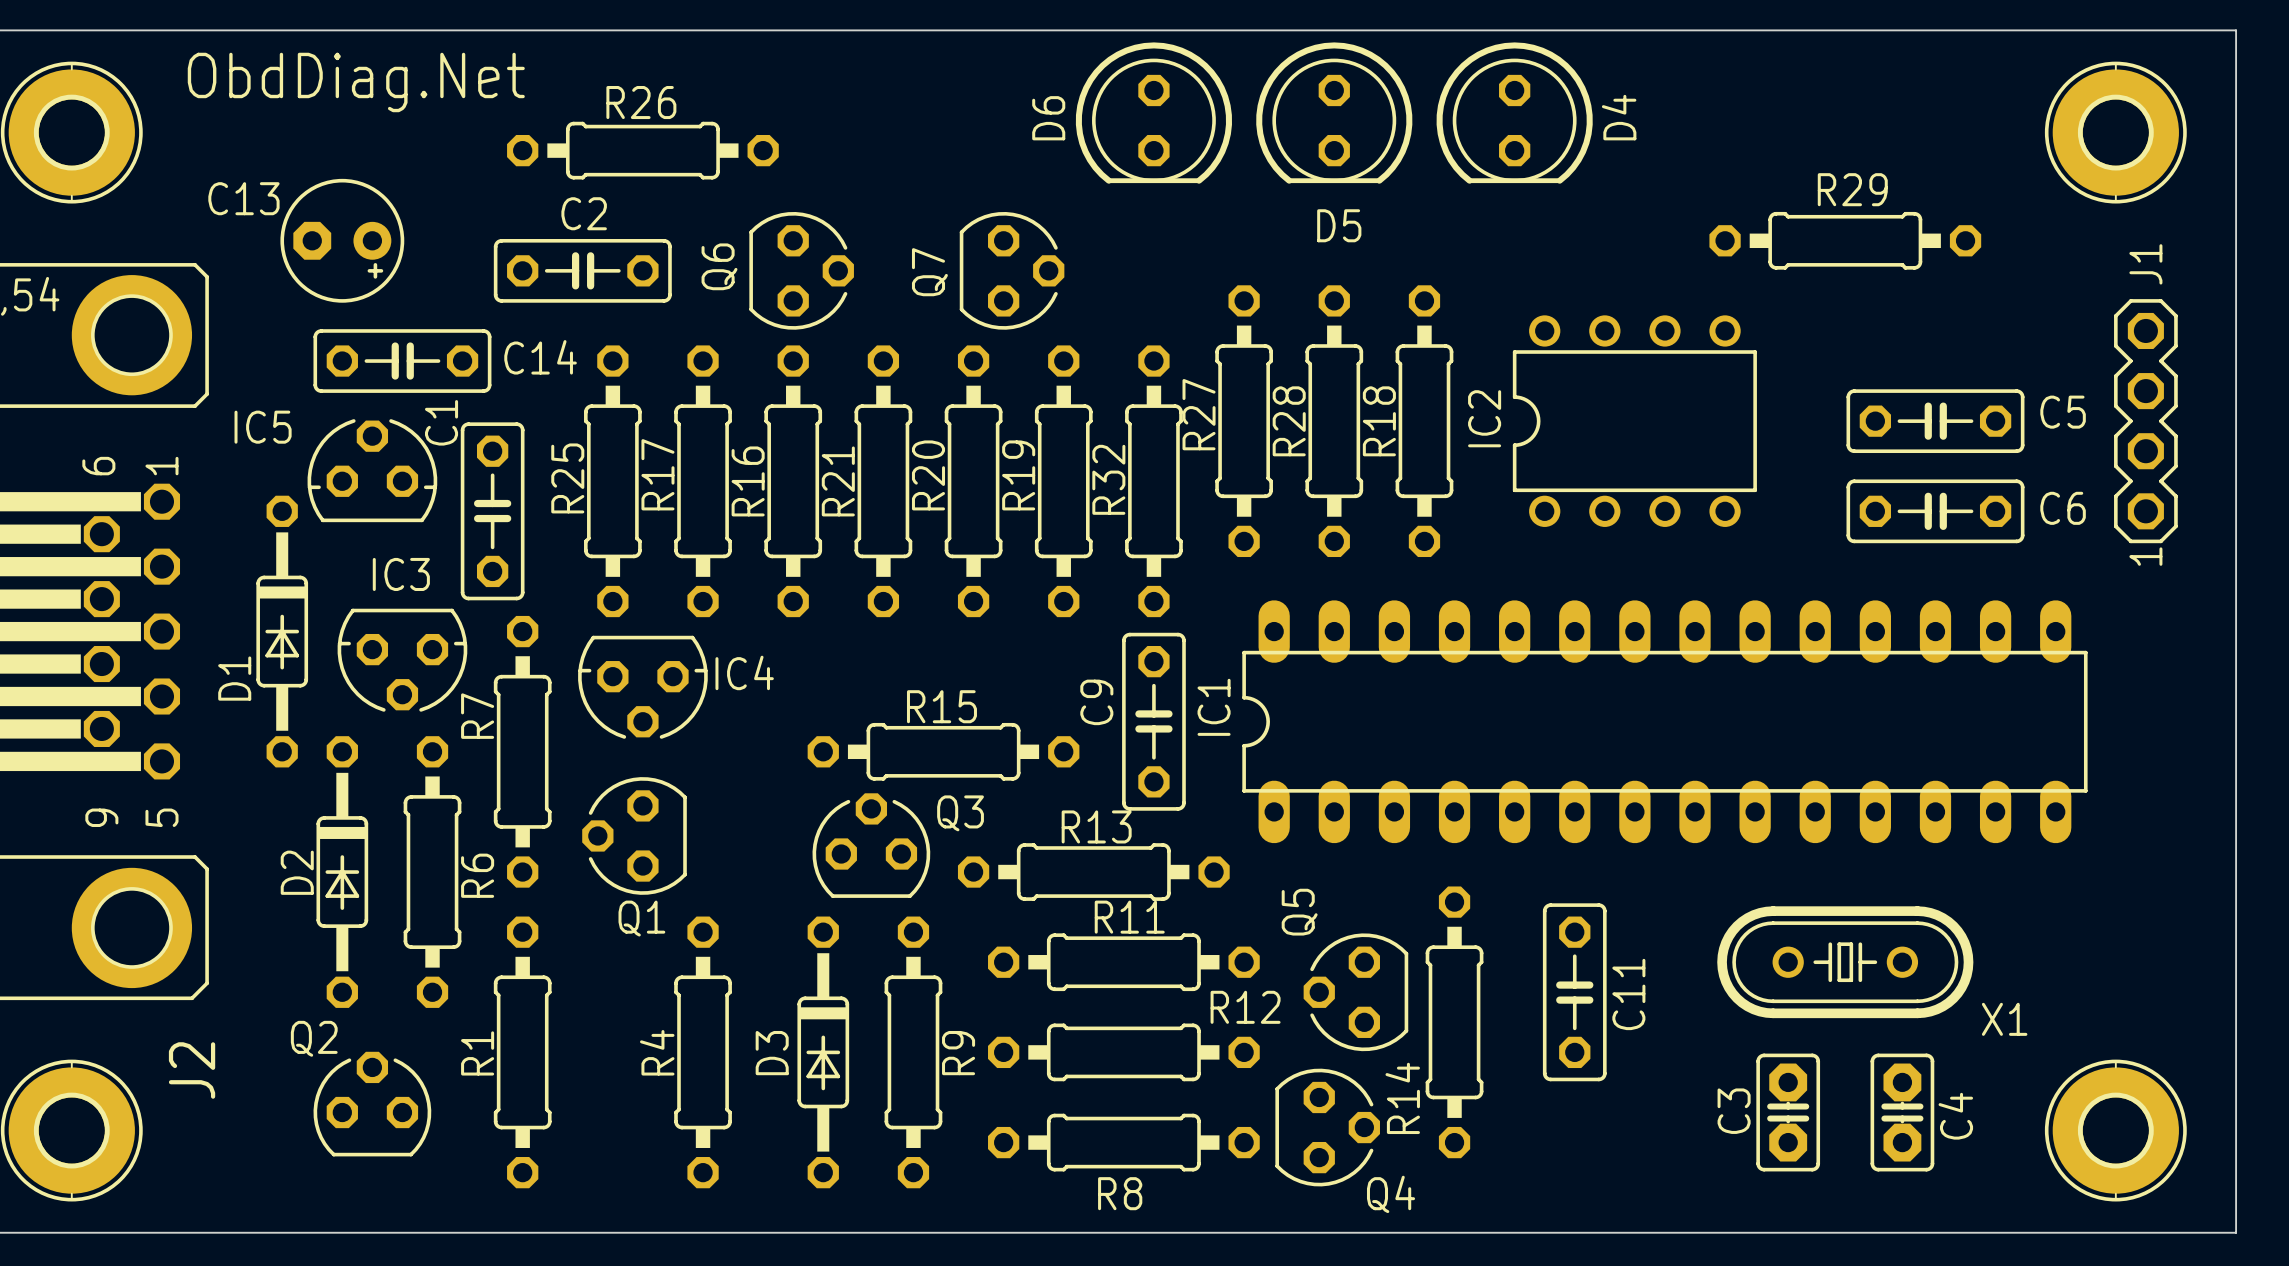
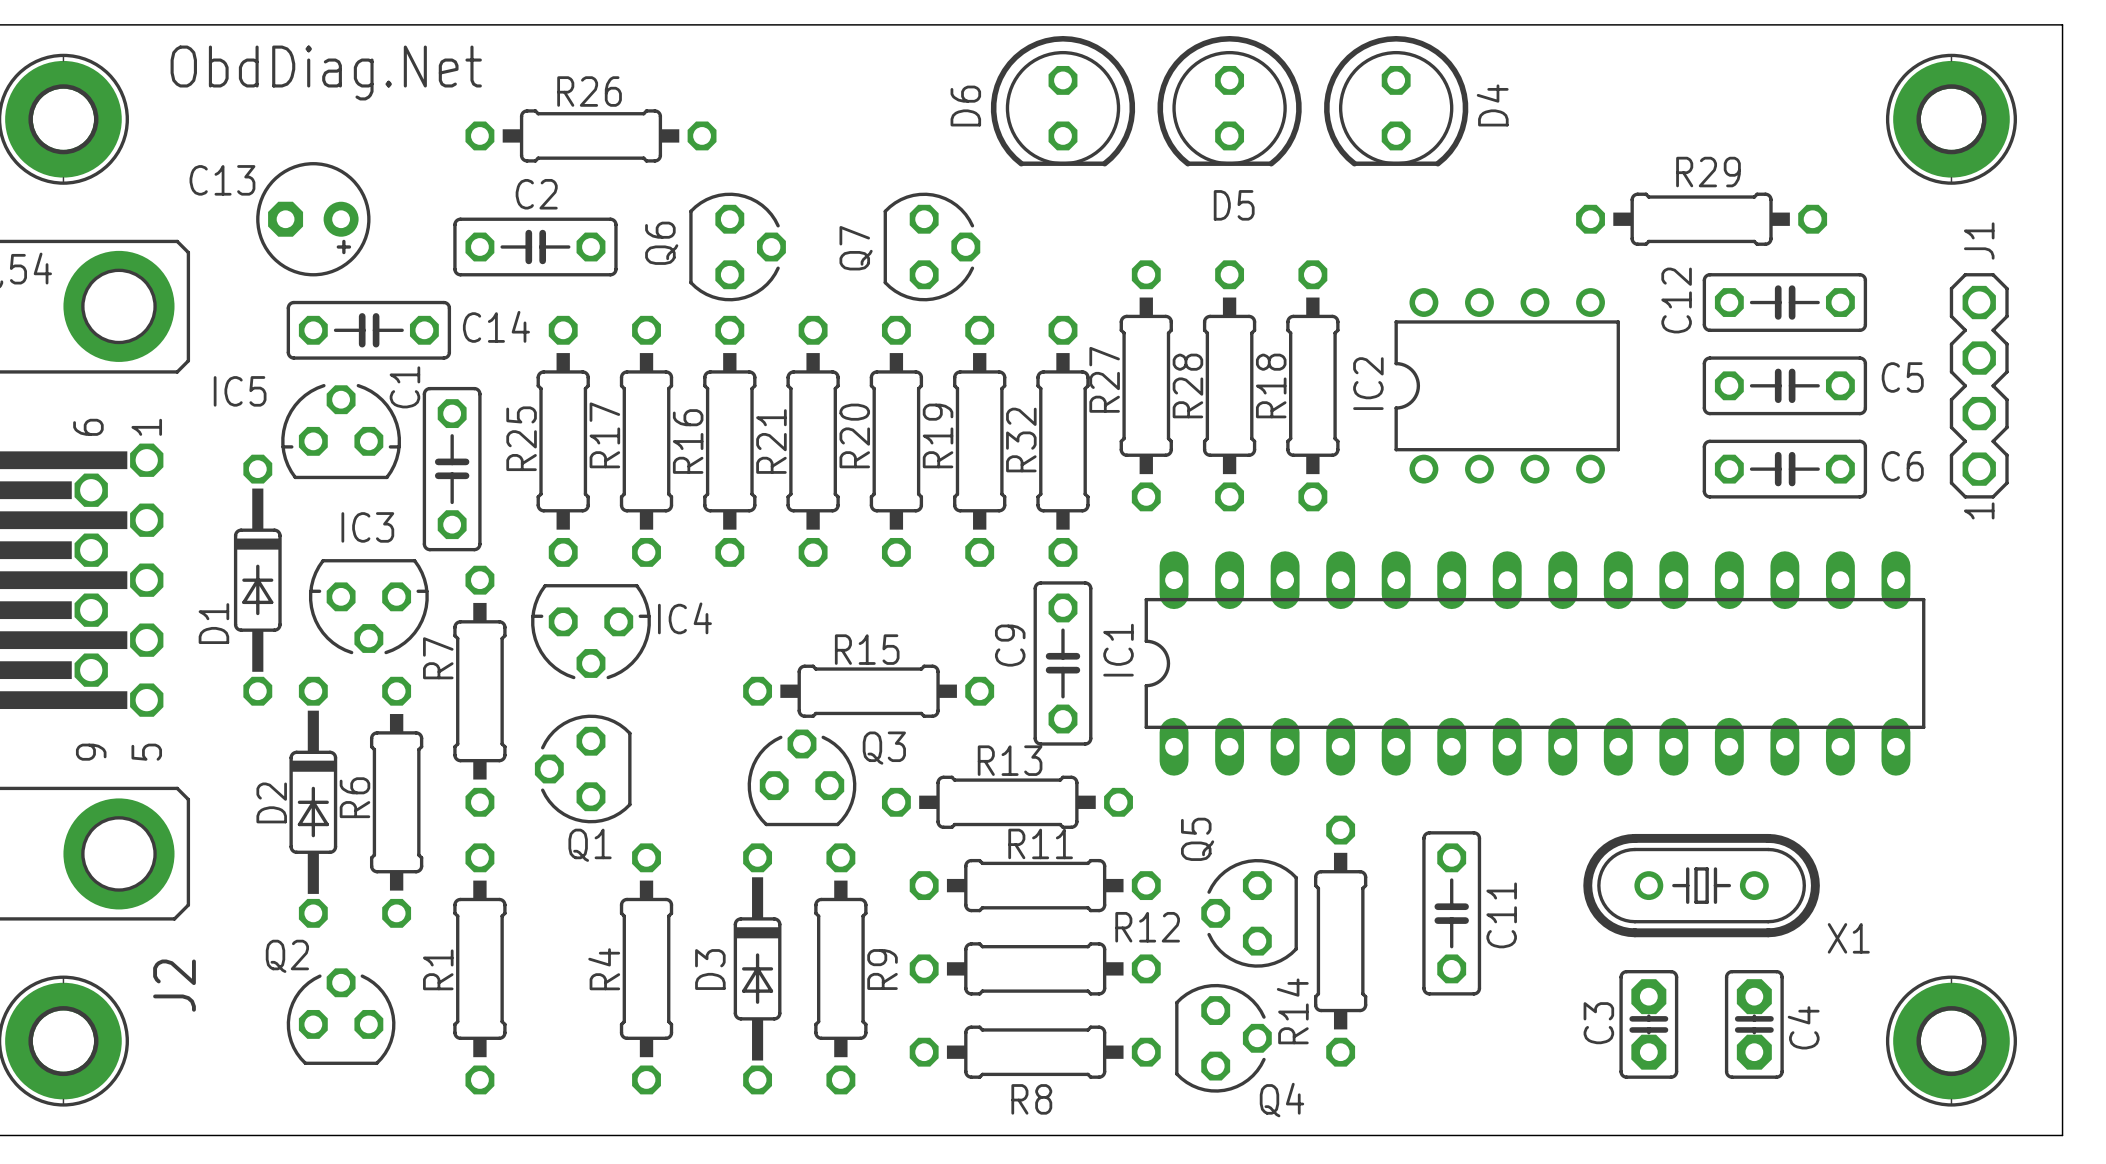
C12: none -> (1784, 302)
R6 name position: R6 (477, 875) -> R6 (354, 797)

